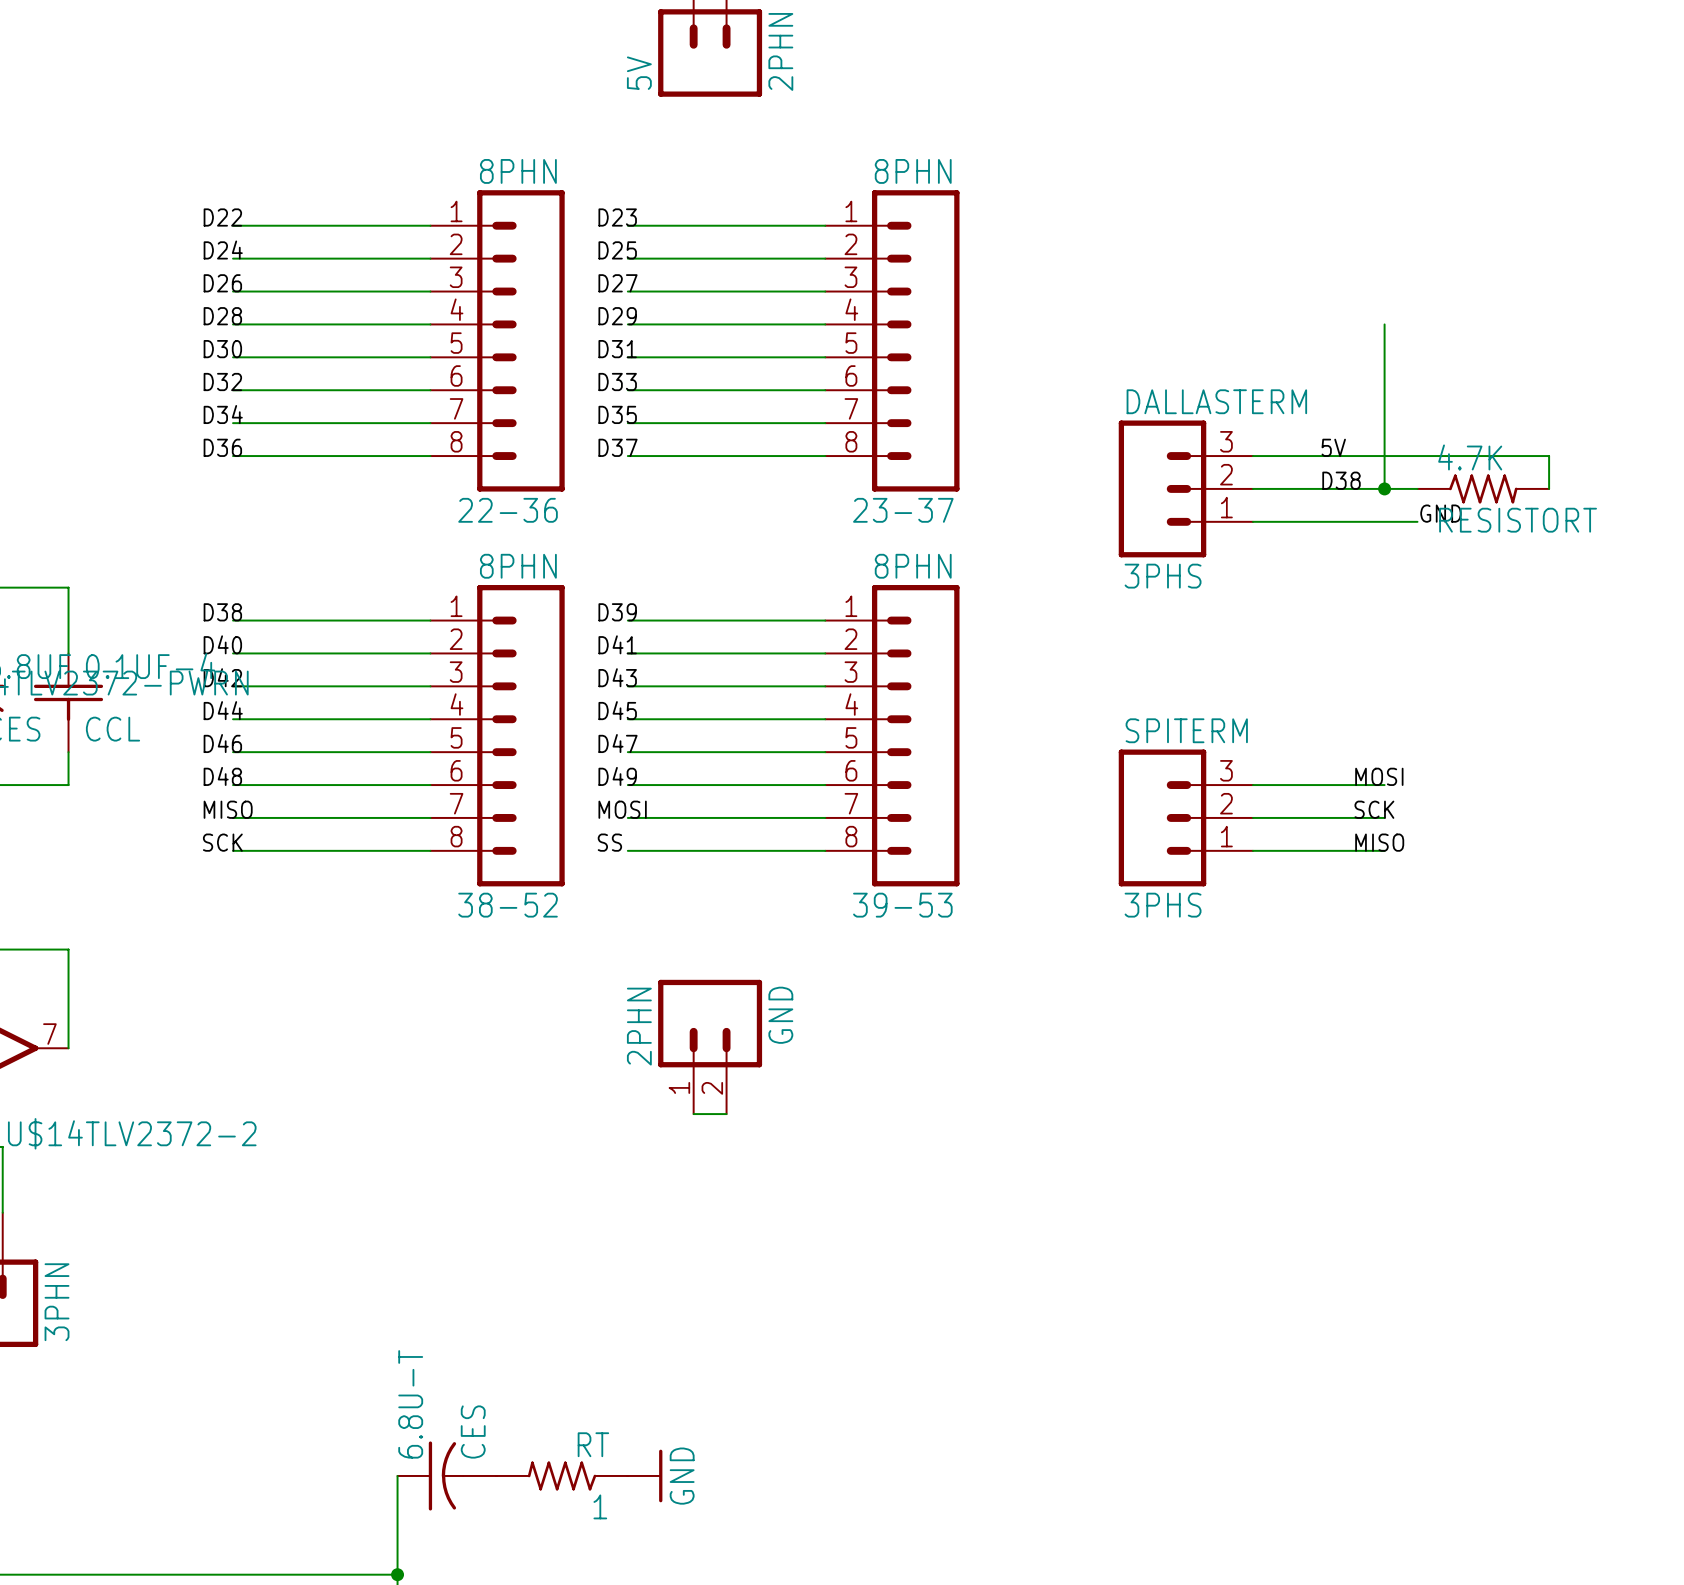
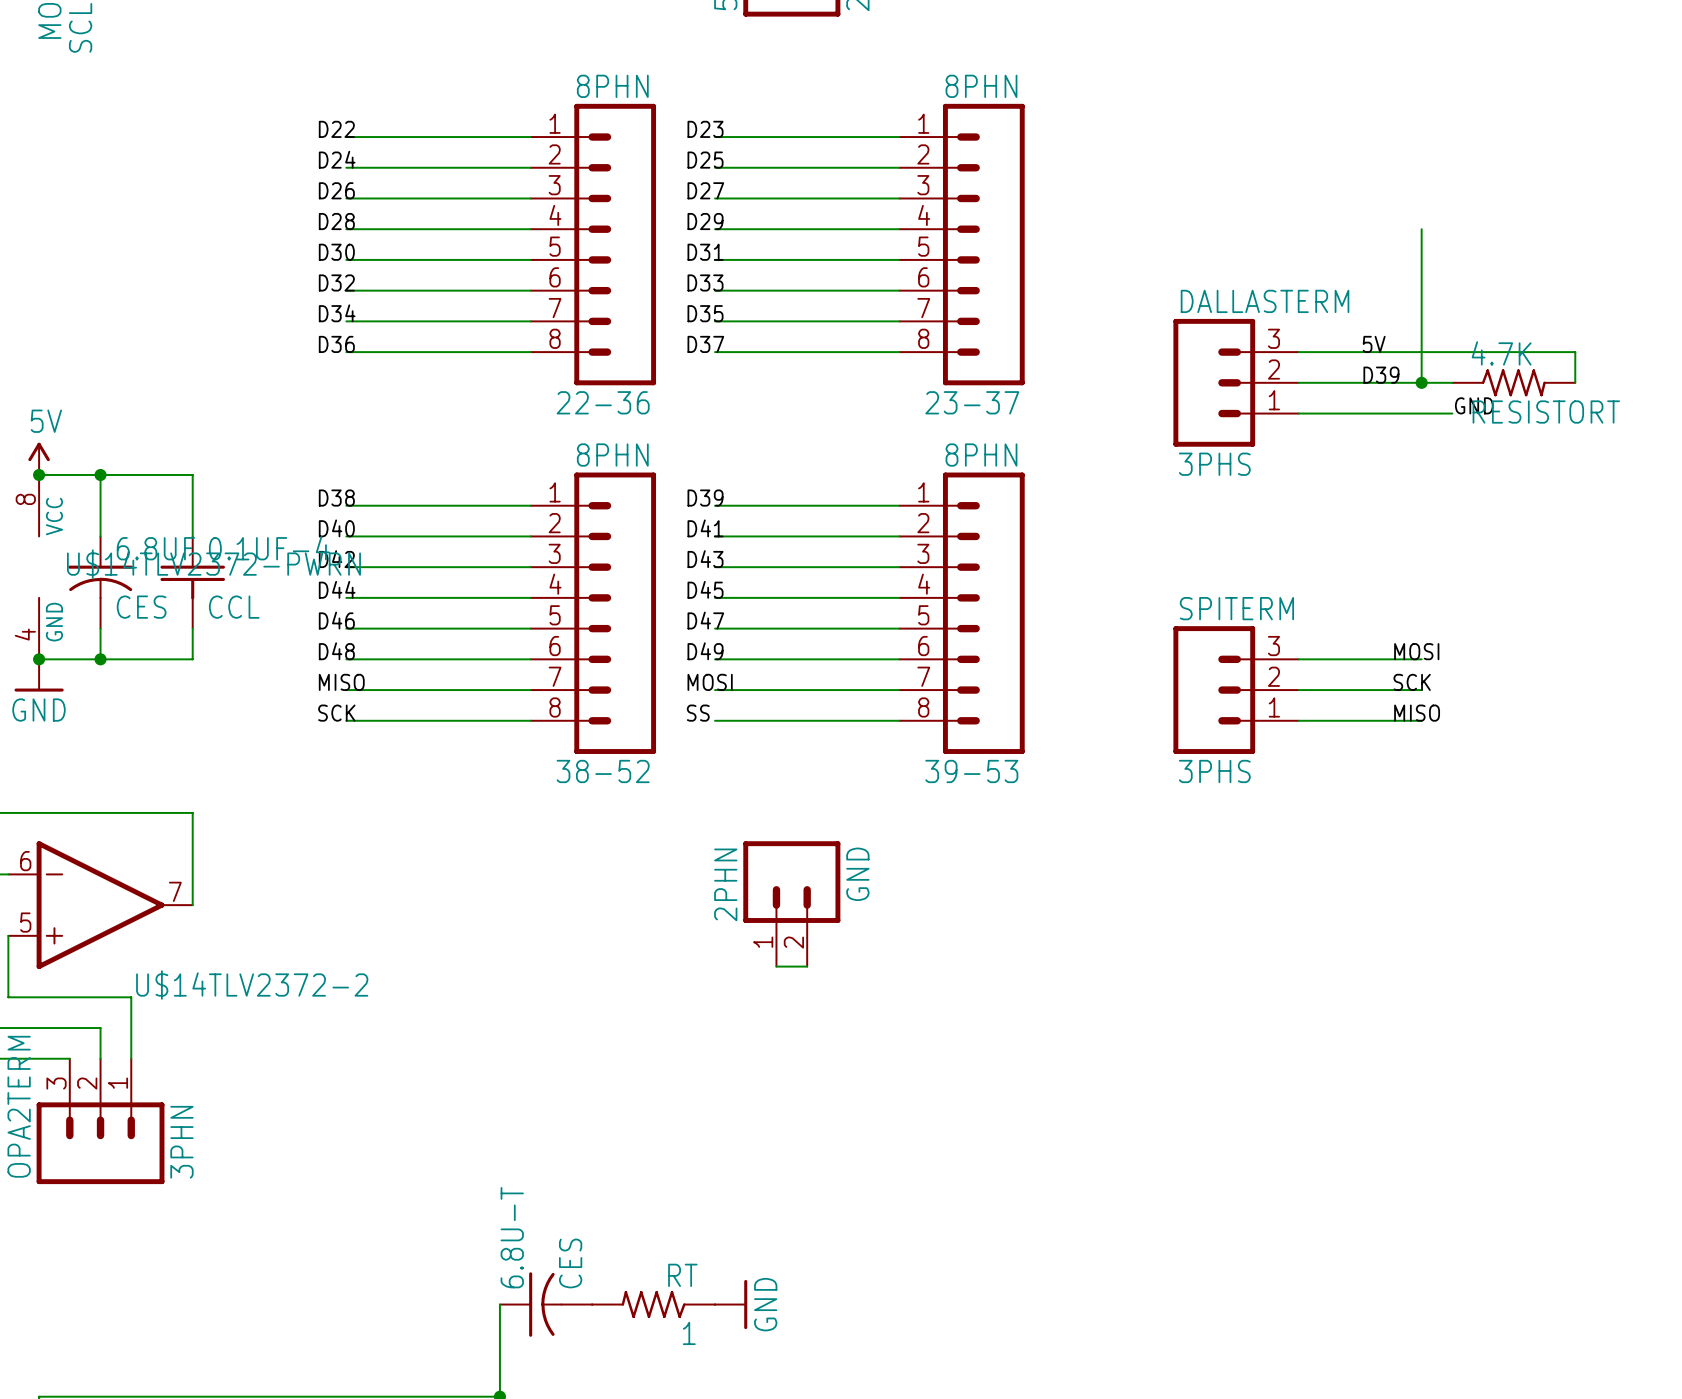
label: D38 (1341, 480) -> D39 (1381, 375)

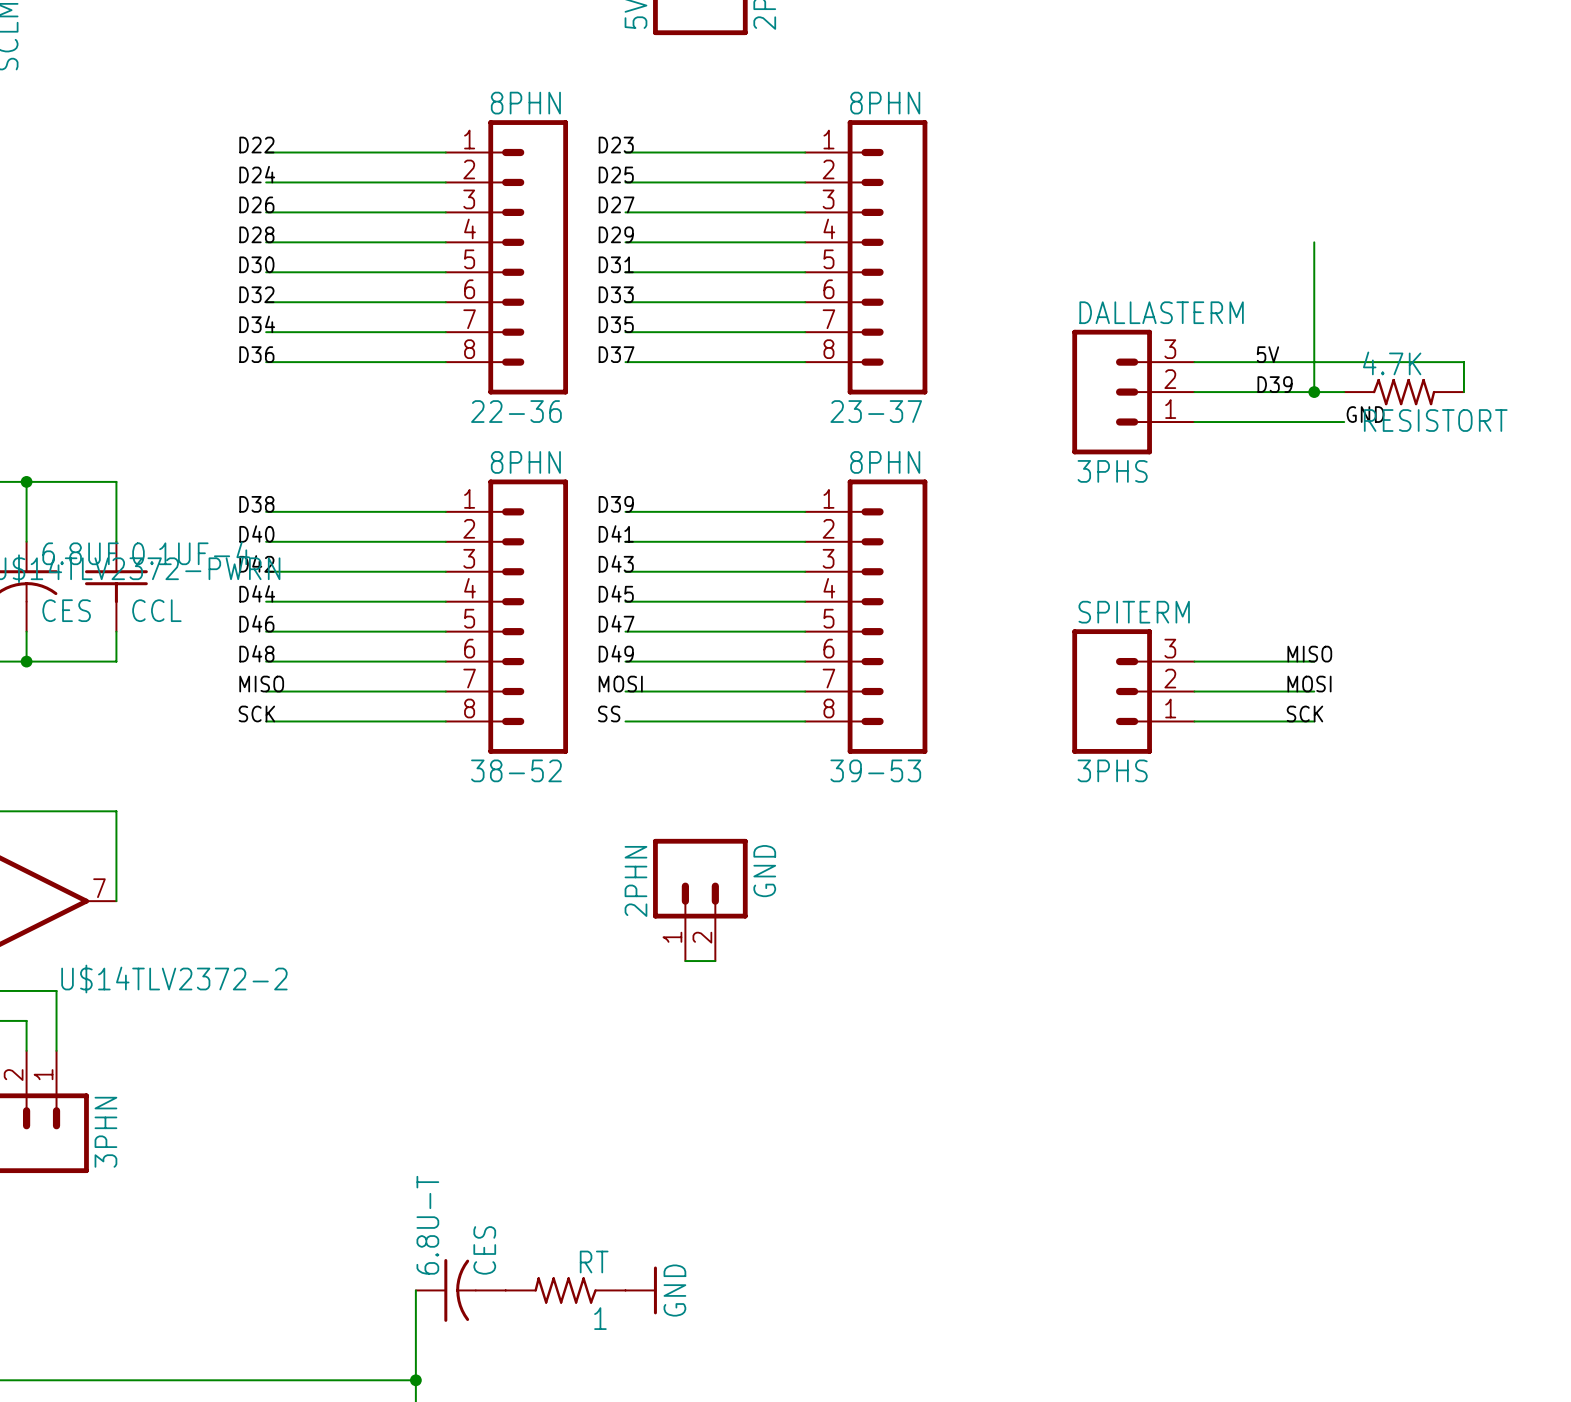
label: MOSI (1416, 651) -> MISO (1309, 654)
label: SCK (1412, 682) -> MOSI (1309, 684)
label: MISO (1417, 713) -> SCK (1304, 713)

